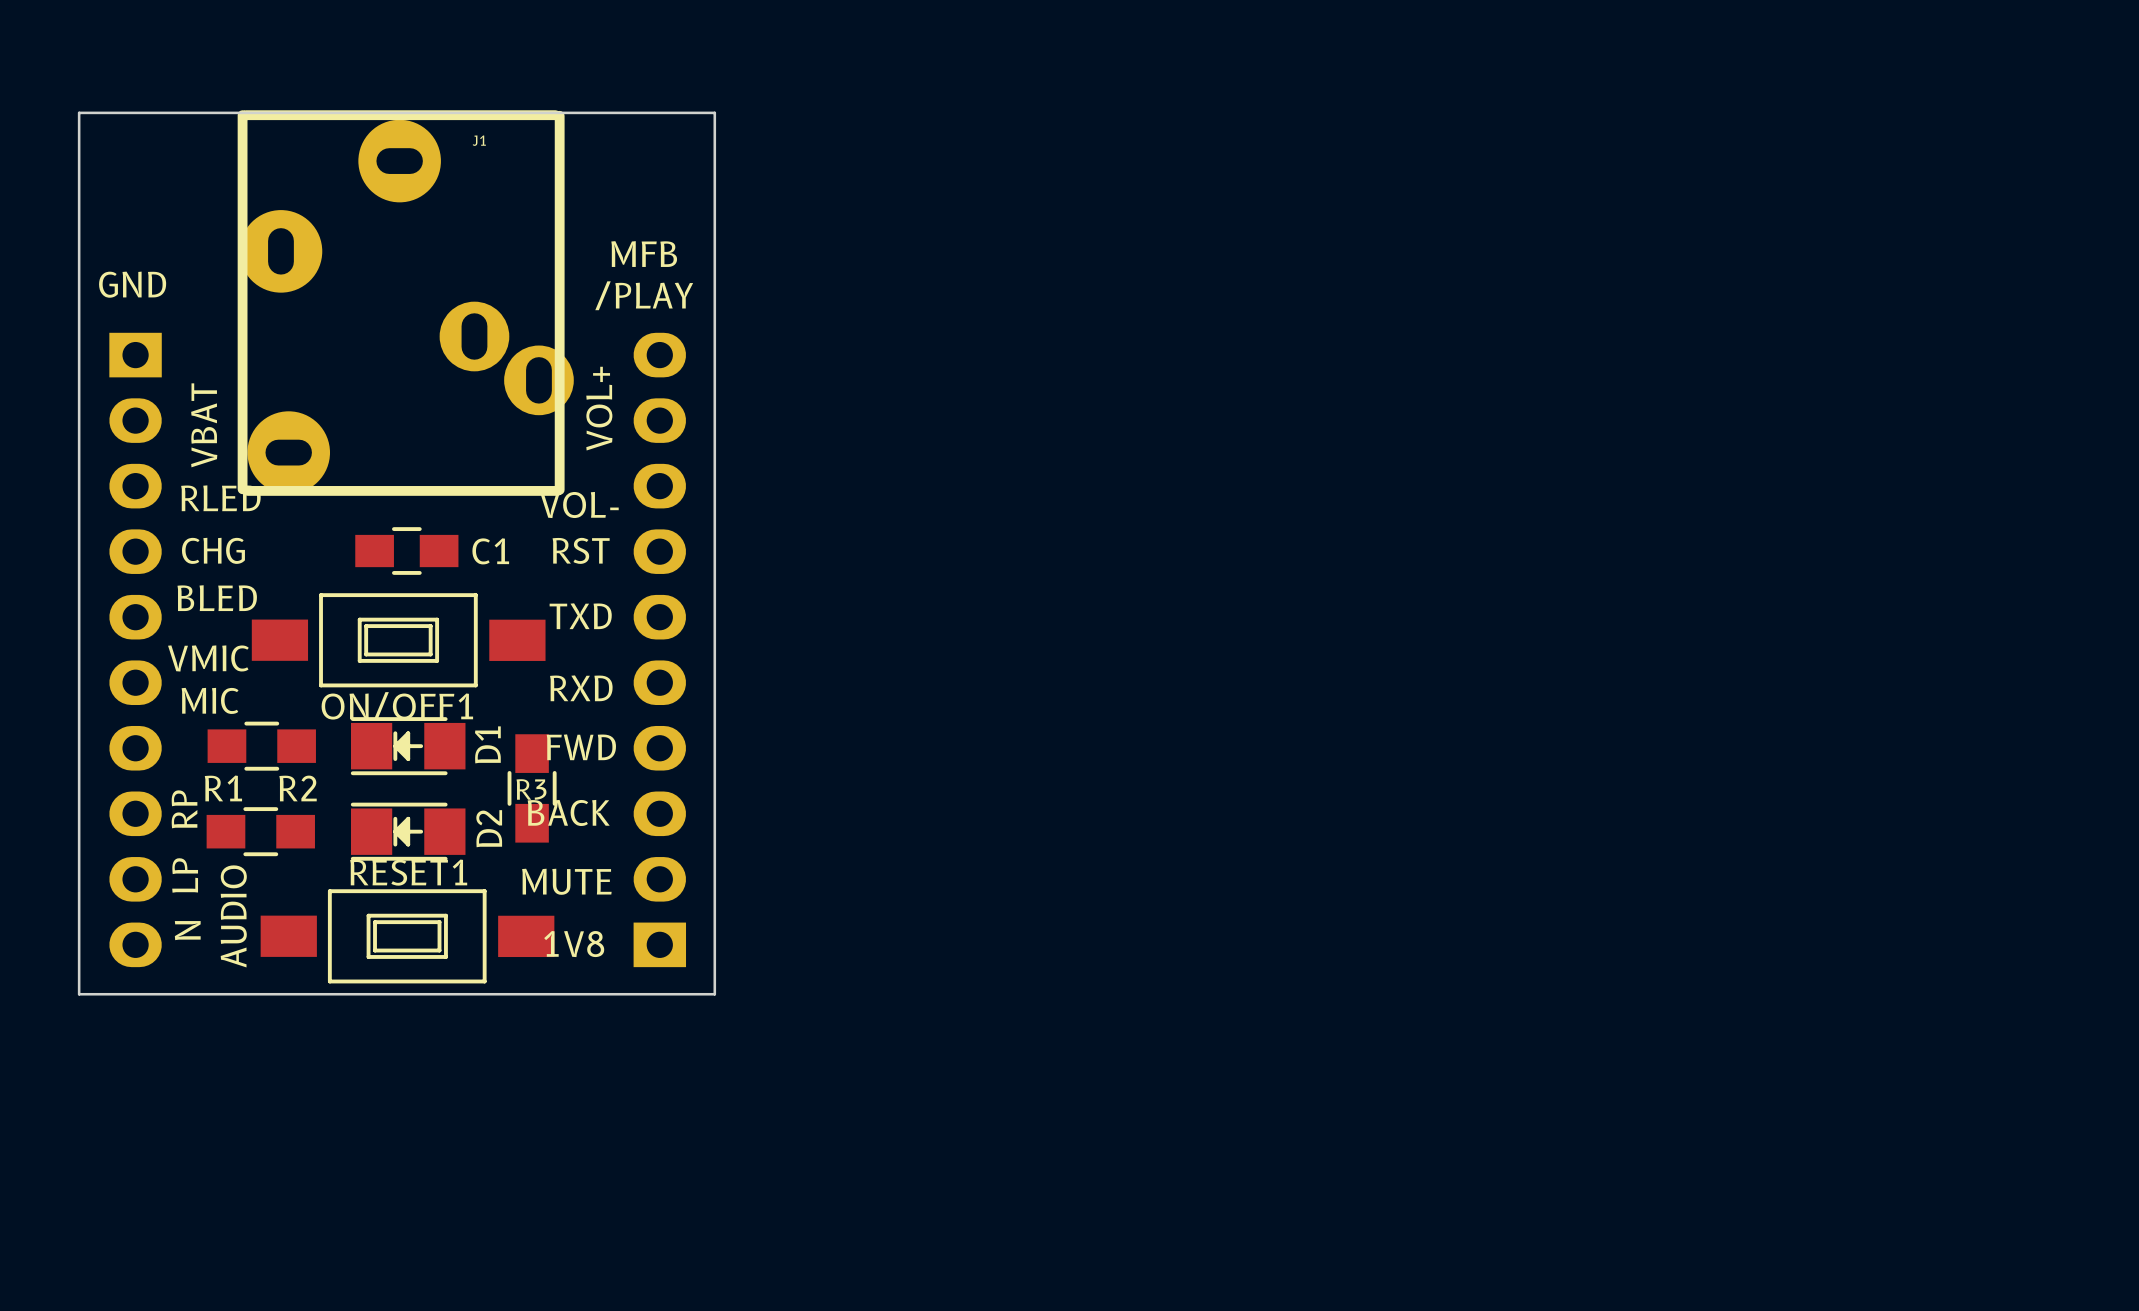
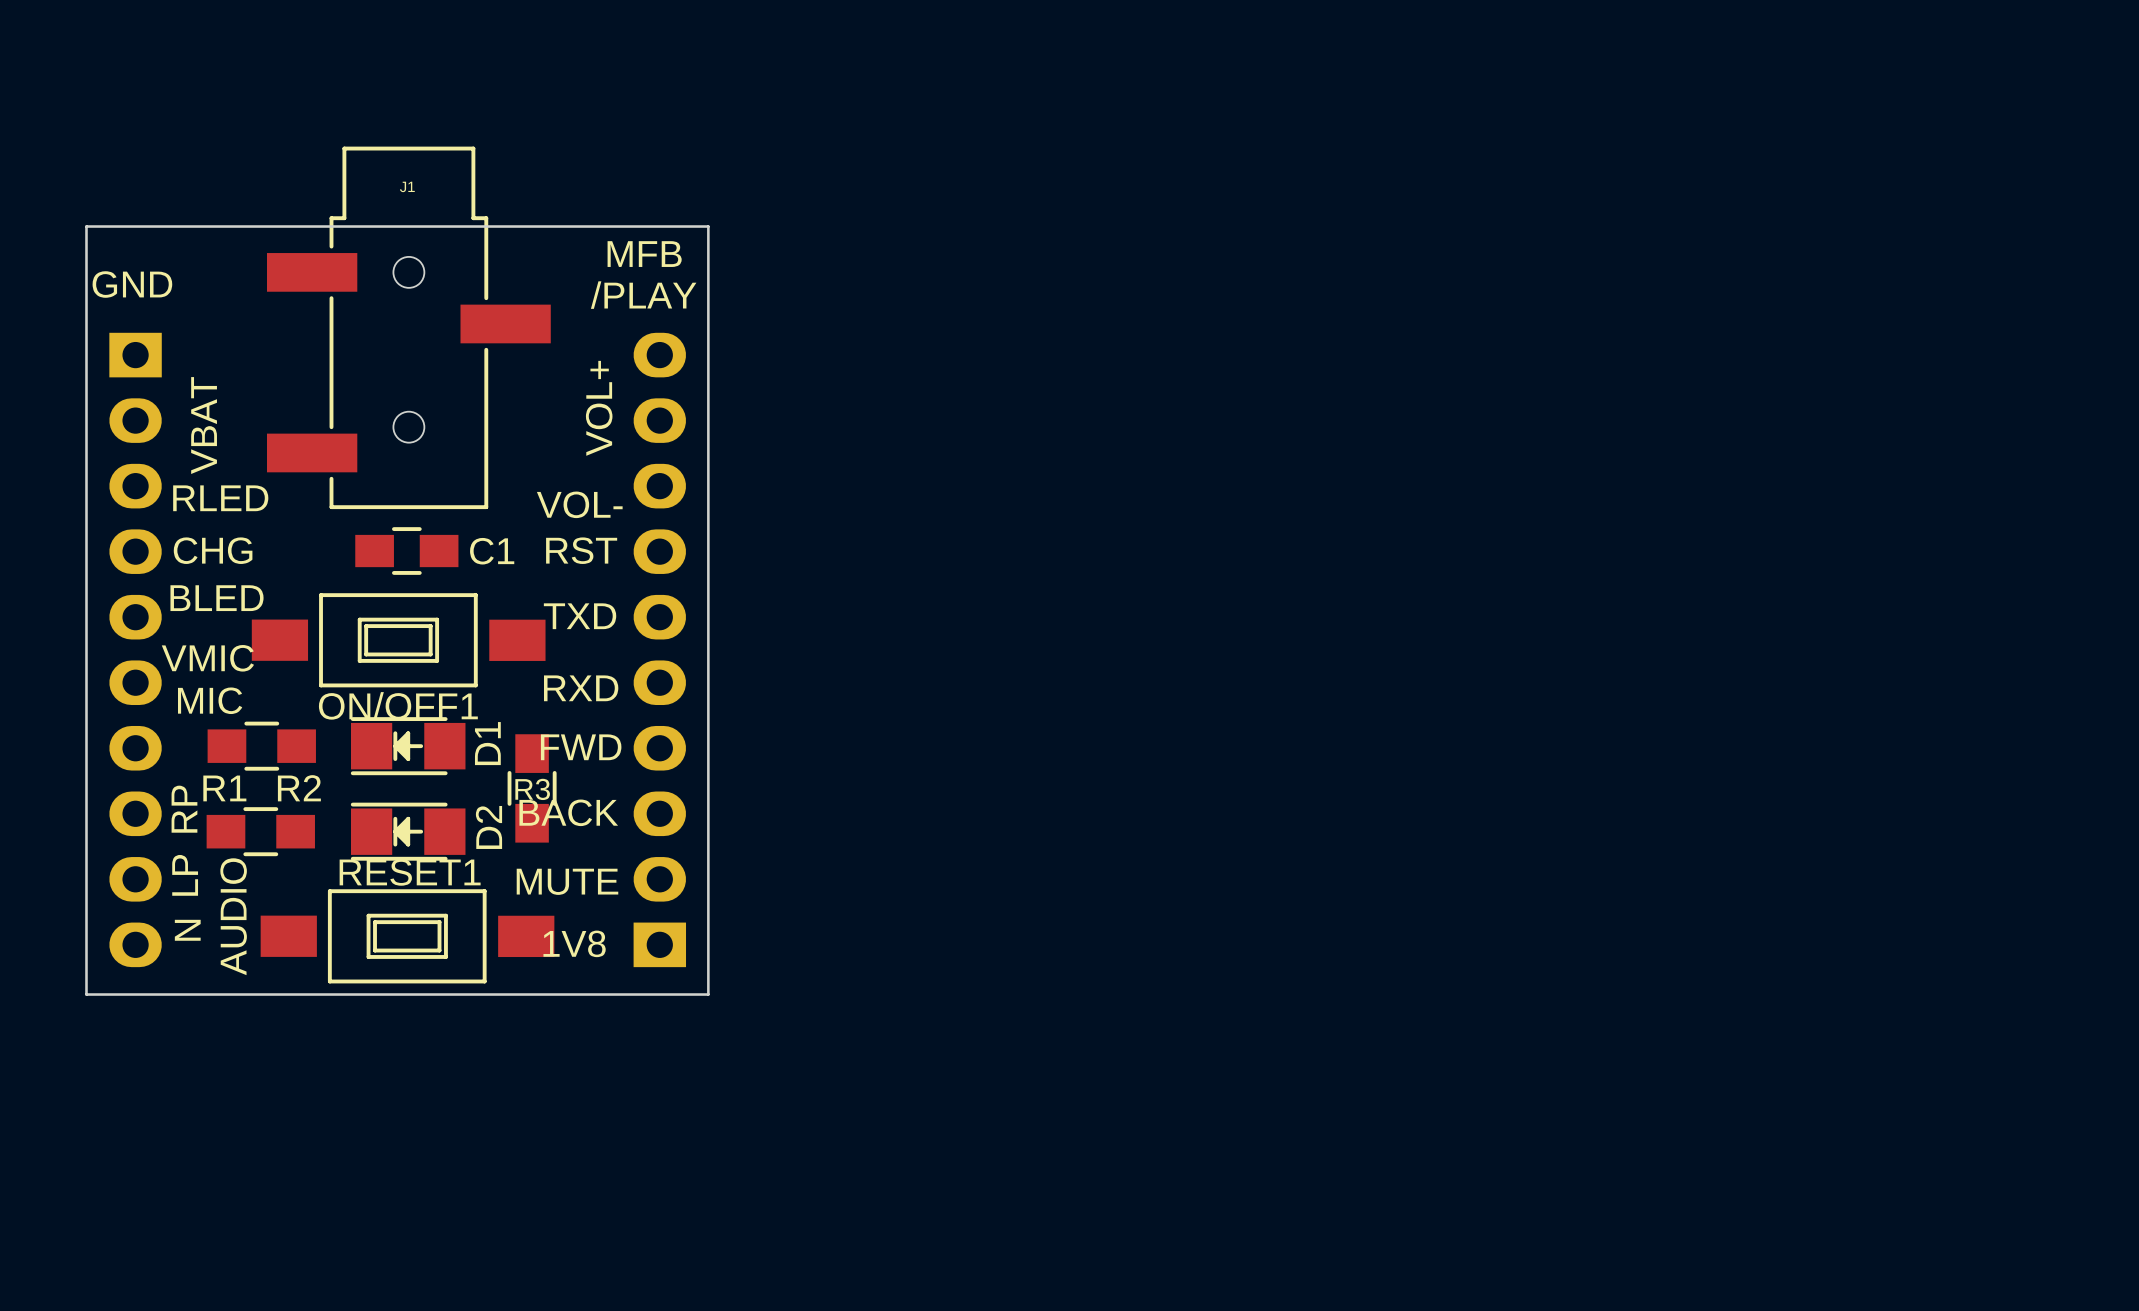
J1 footprint: [237, 110, 574, 496] -> [267, 146, 551, 510]
board edge: (79, 112) (714, 112) (714, 994) (79, 994) (79, 112) -> (86, 226) (86, 994) (708, 994) (708, 226) (86, 226)
J1 name position: J1 (479, 140) -> J1 (407, 186)

